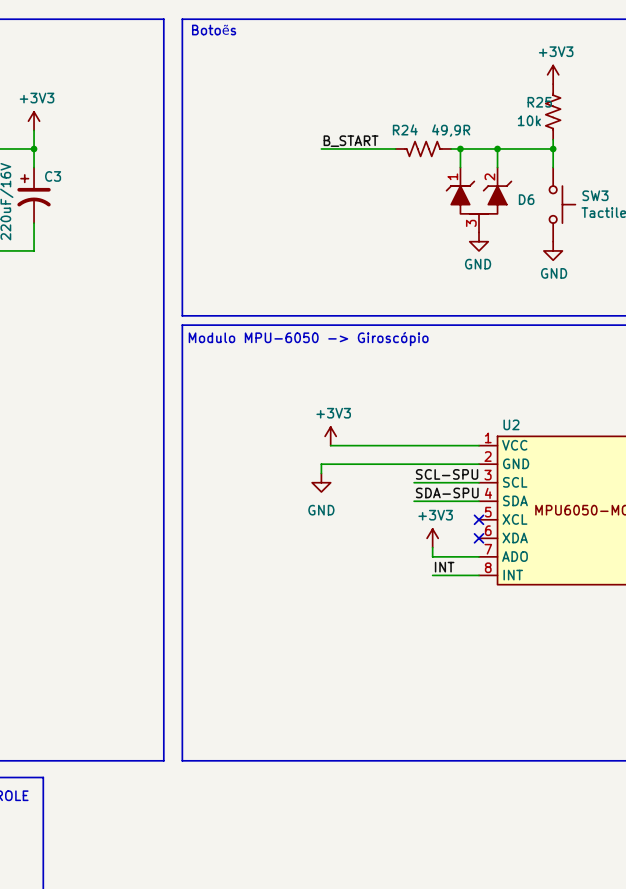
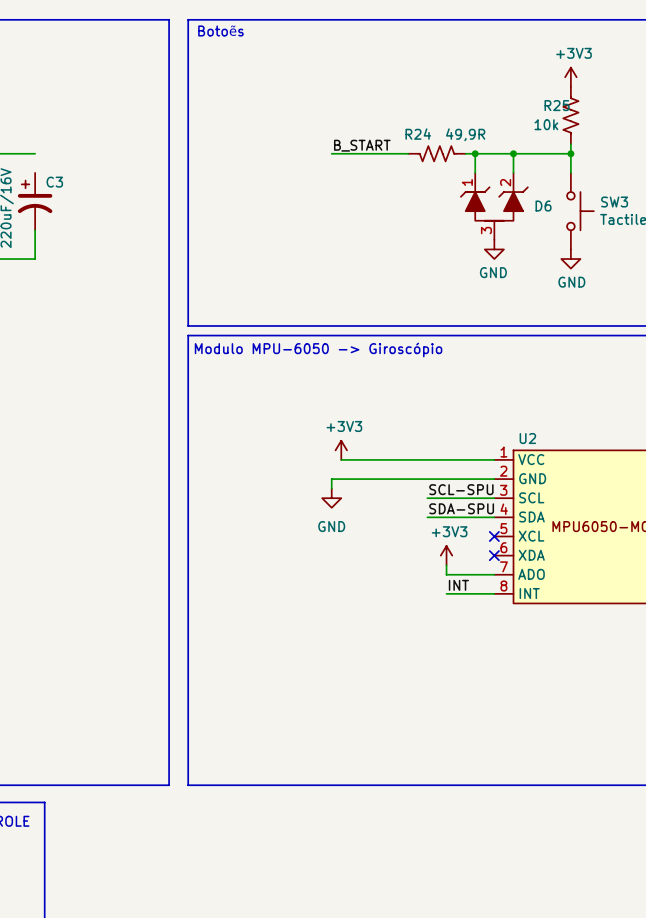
power symbol: +3V3 (34, 121) -> none
wire: (34, 130) (34, 167) -> none
junction: (34, 148) -> none

